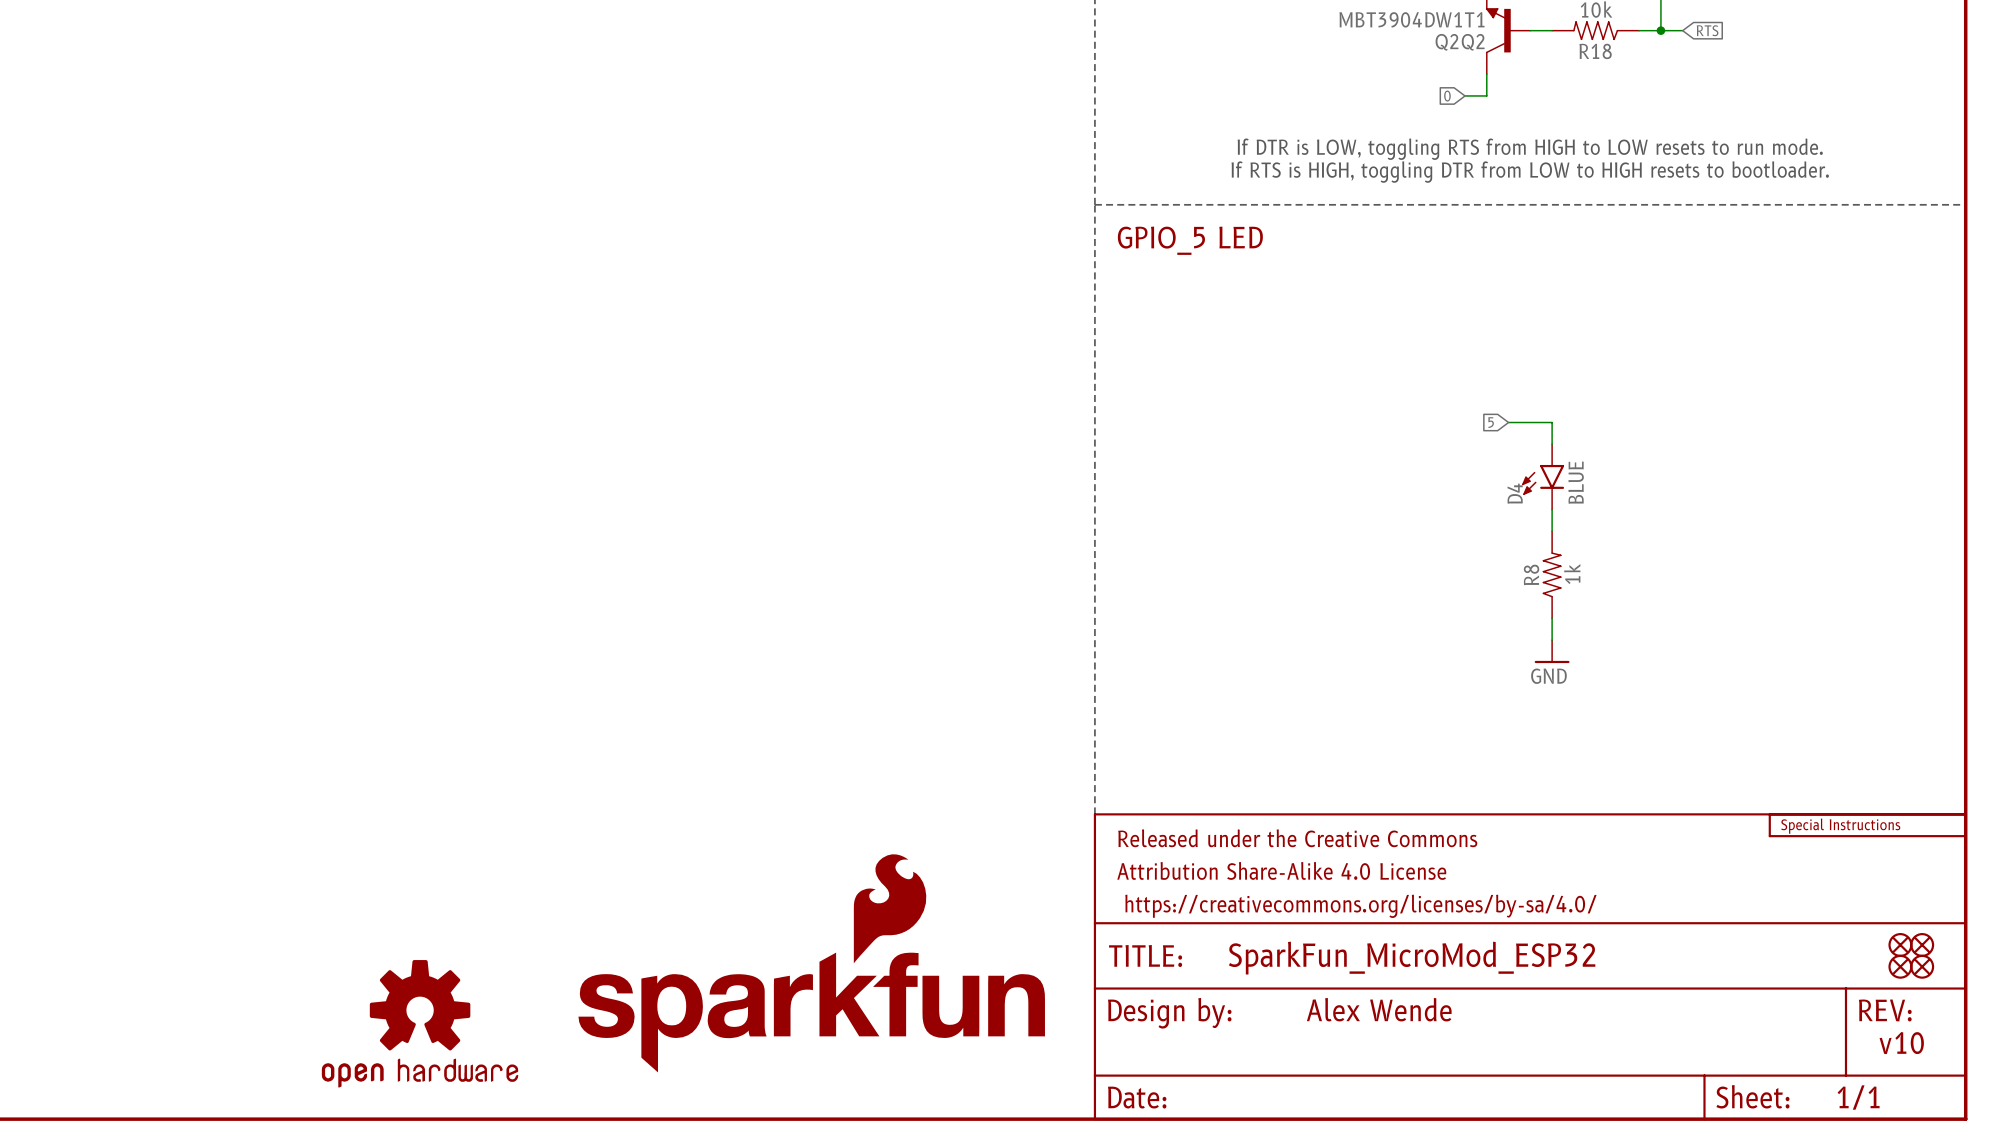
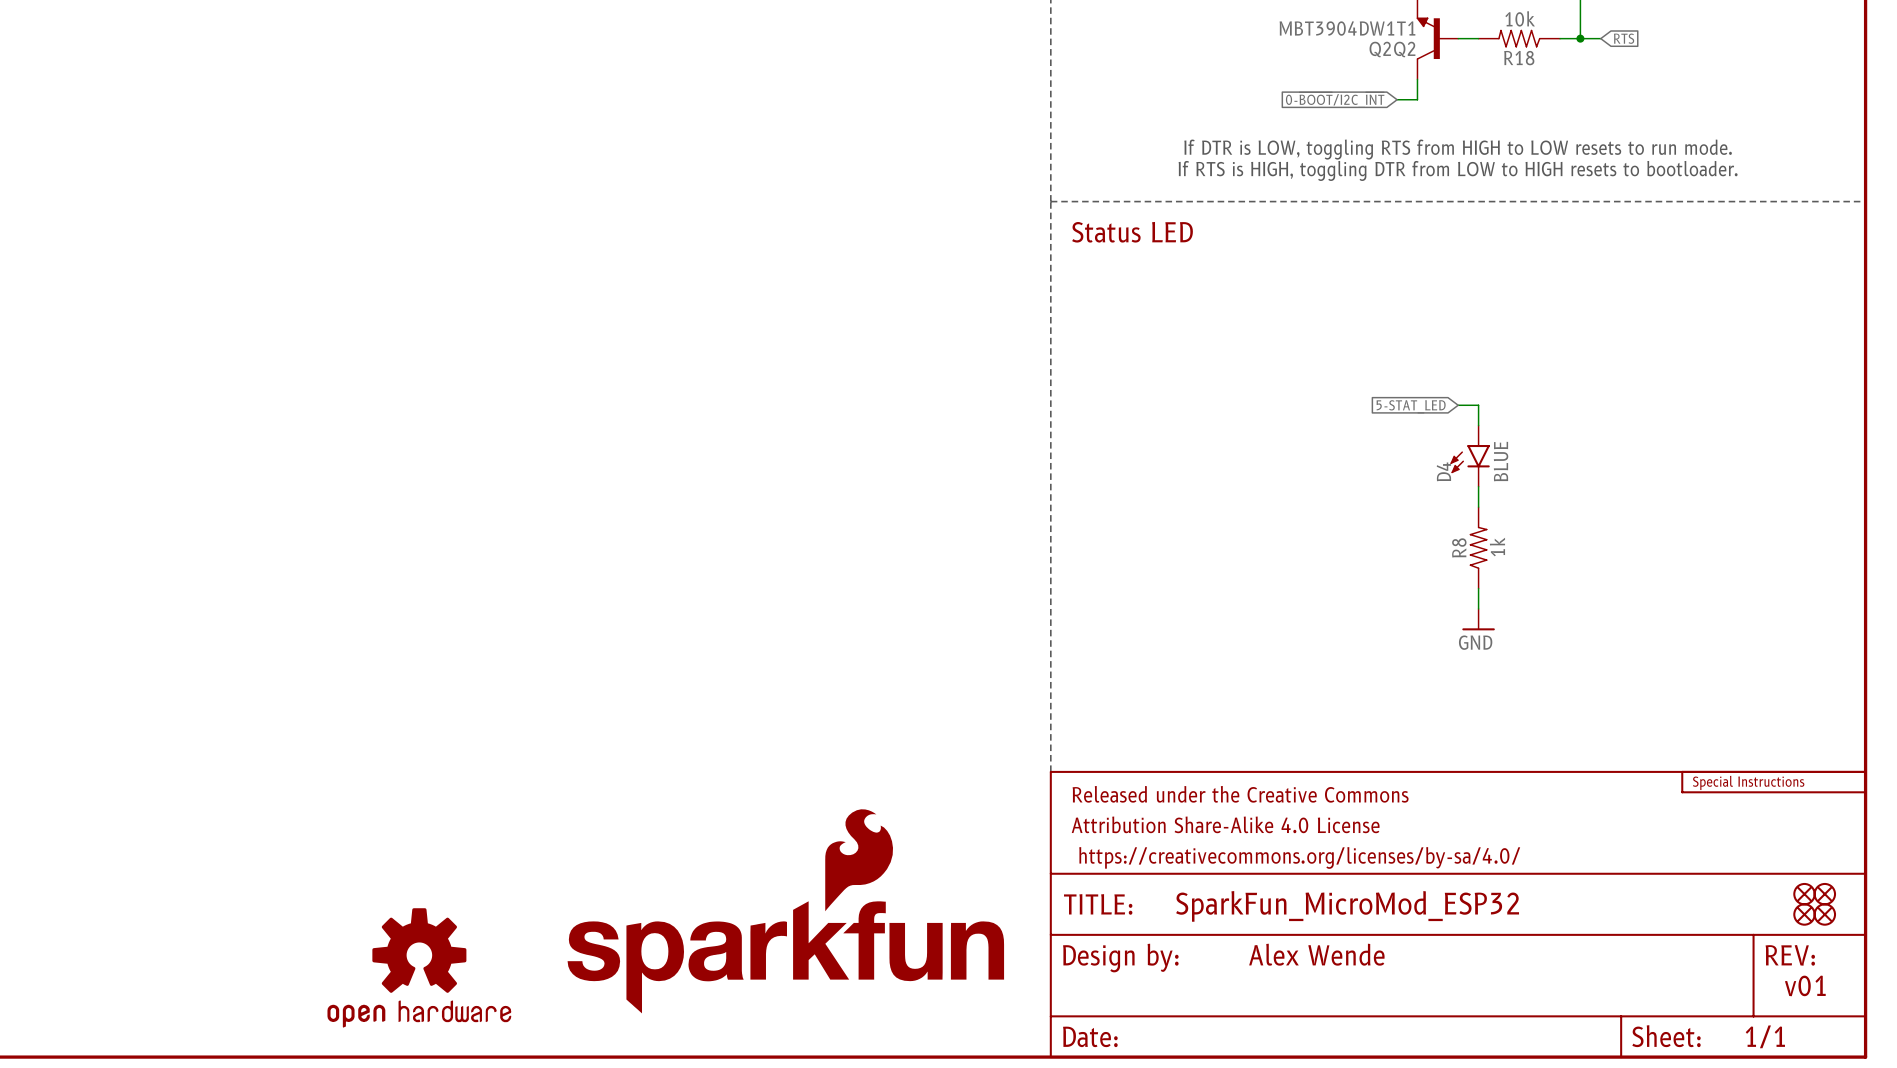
global label: 0 (1447, 96) -> 0-~{BOOT}/I2C_~{INT} (1335, 100)
text: GPIO_5 LED (1190, 240) -> Status LED (1132, 232)
global label: 5 (1491, 422) -> none
wire: (1508, 422) (1530, 422) -> none
global label: none -> 5-STAT_LED (1411, 406)
text: v10 (1901, 1043) -> v01 (1805, 985)

